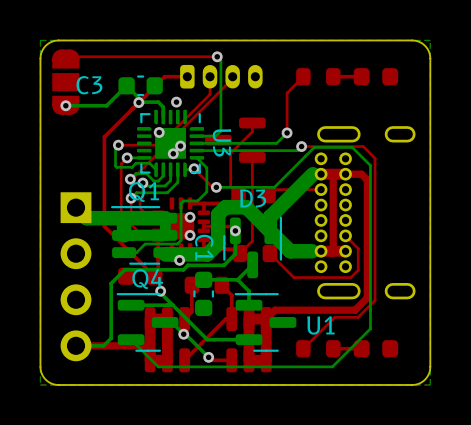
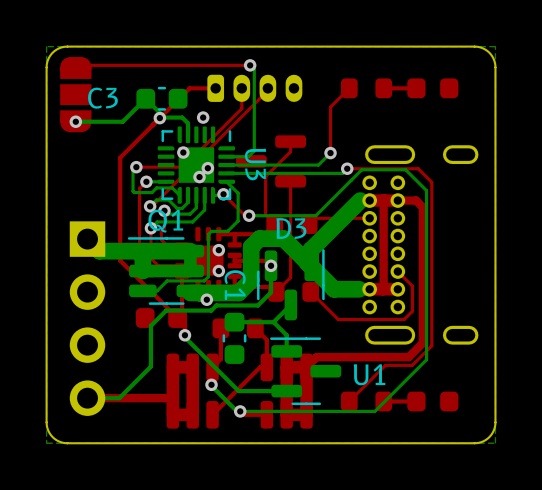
bottom track: (144, 269) (124, 269) (111, 283) (111, 338) -> (166, 310) (150, 325) (150, 366) (128, 389)
bottom track: (172, 305) (131, 305) -> none
bottom track: (370, 312) (370, 328) (332, 366) (158, 366) (131, 339) -> (426, 359) (374, 411) (237, 411) (210, 384)
Q4: (147, 322) -> none
bottom track: (165, 322) (171, 322) (208, 357) -> none

